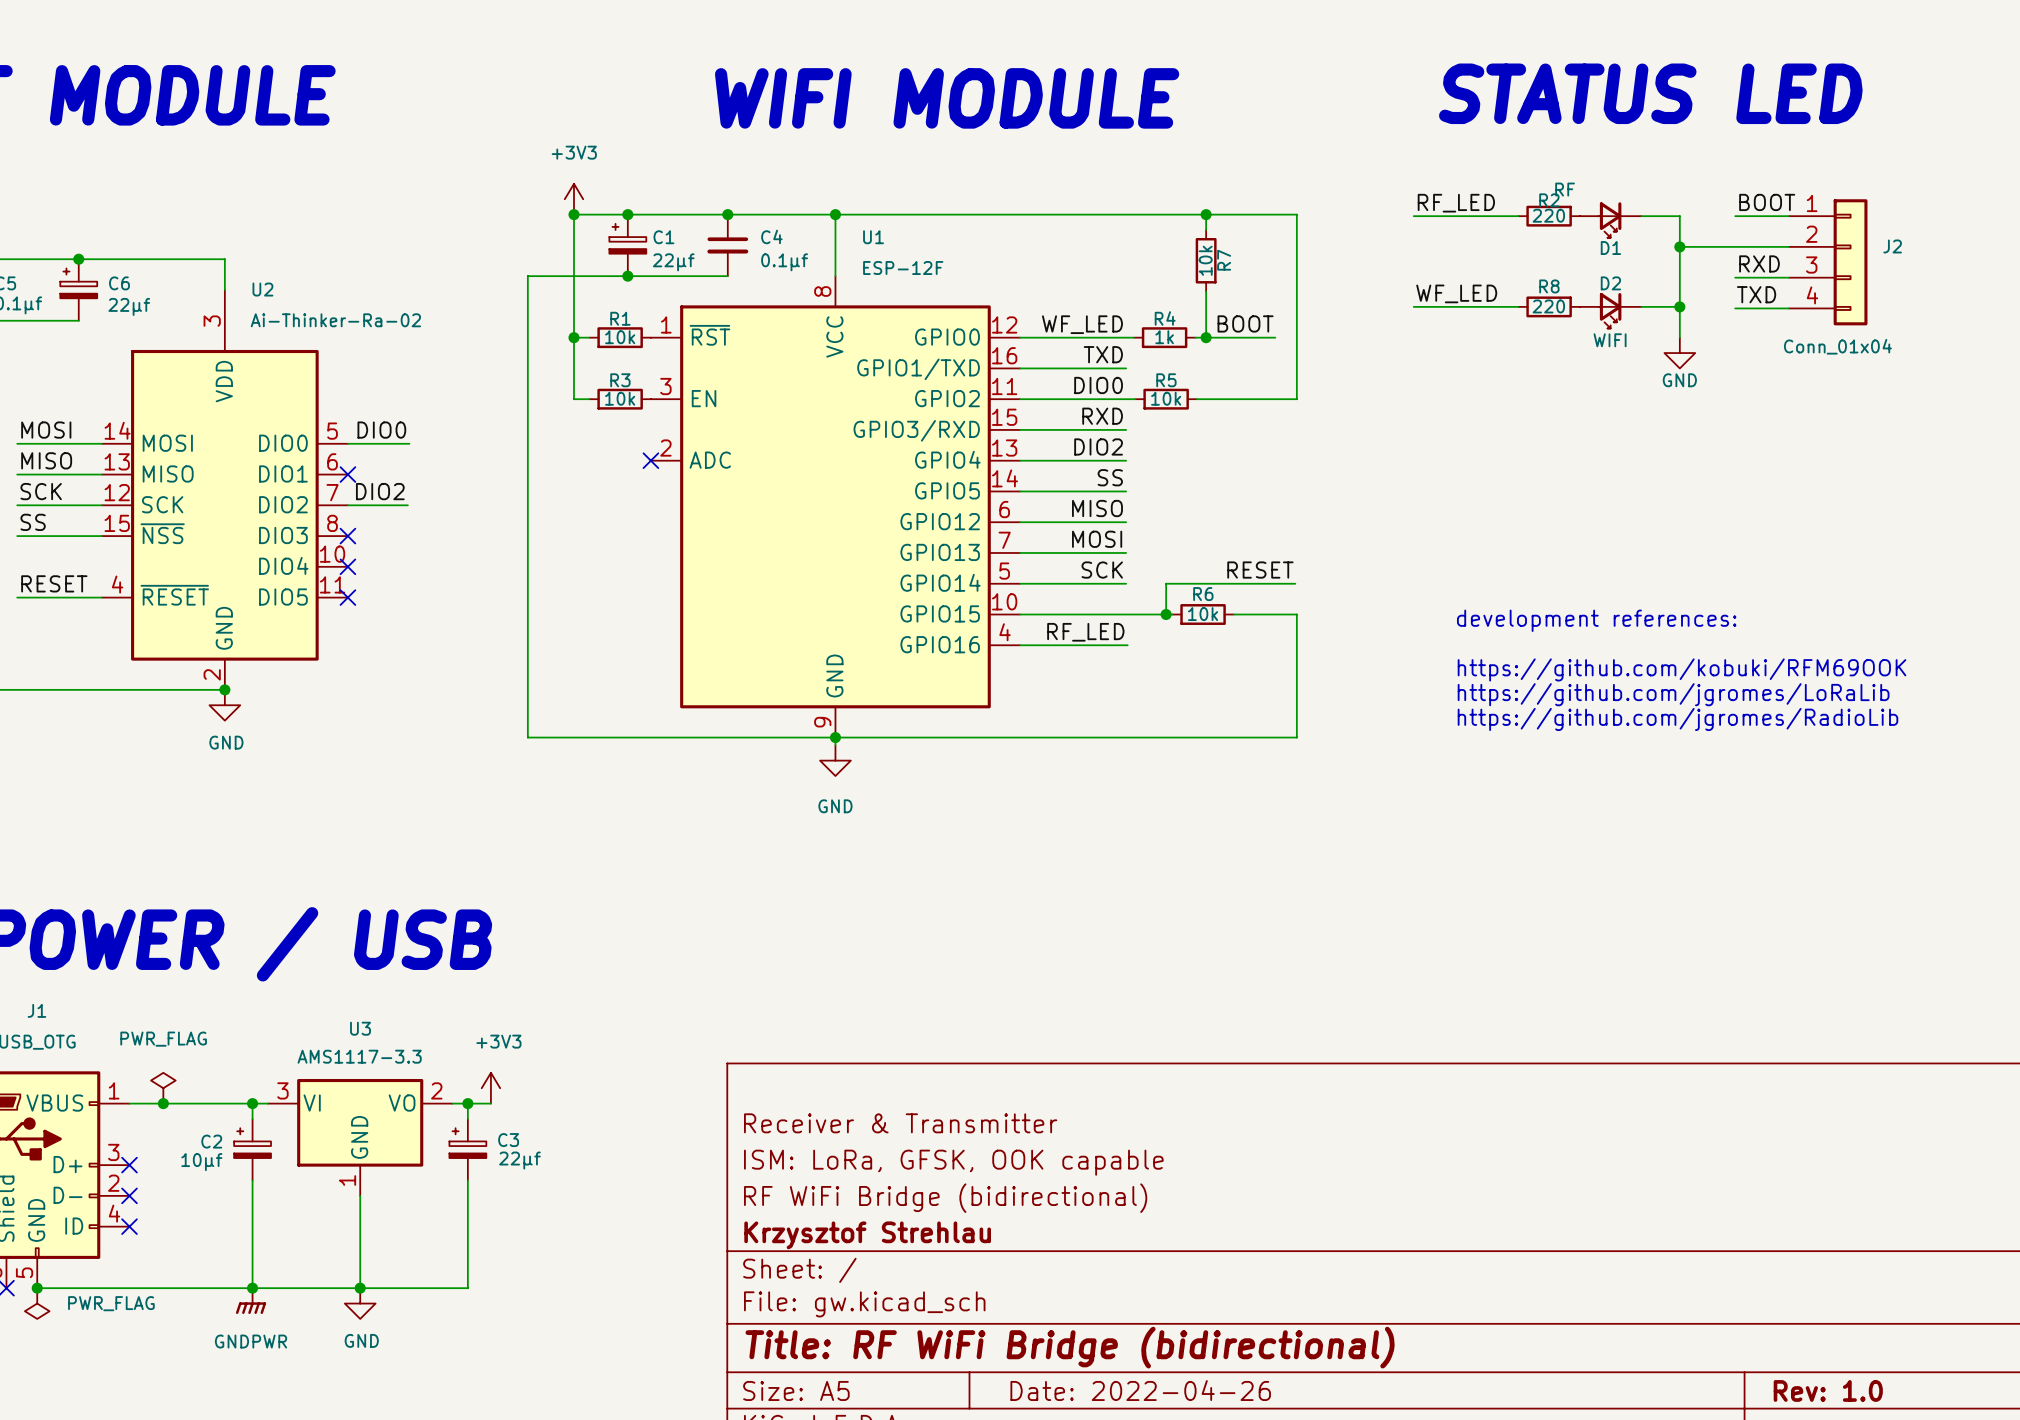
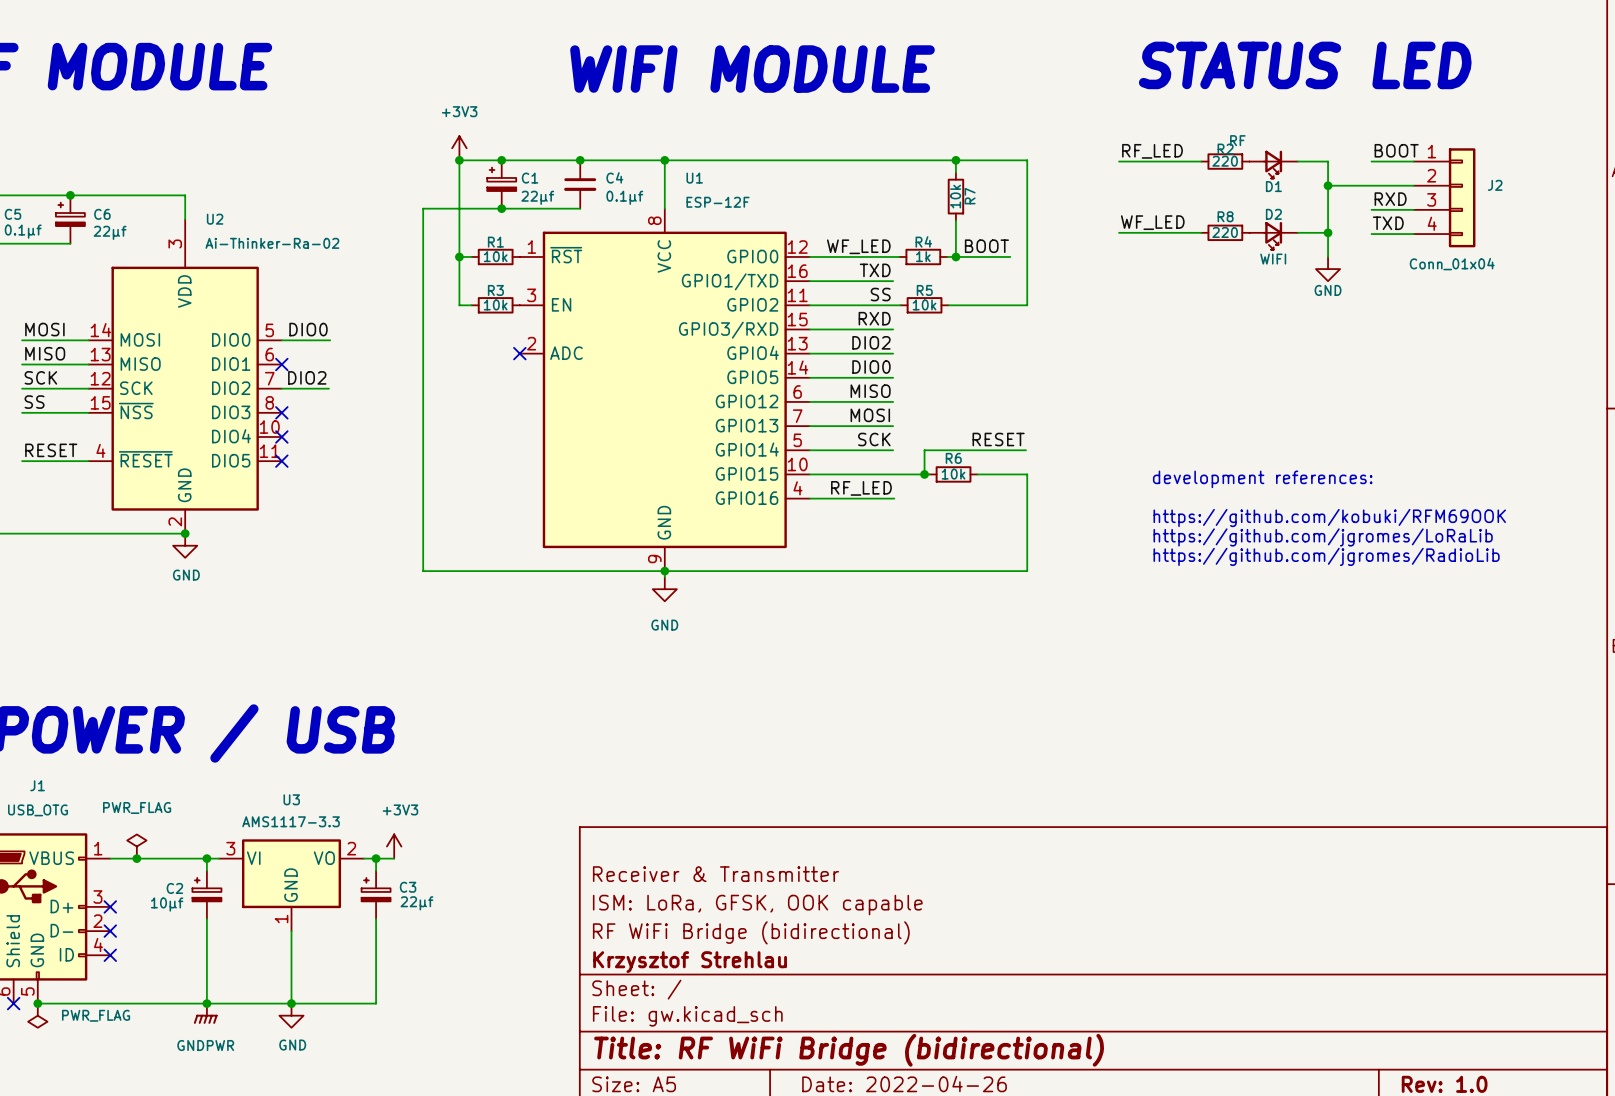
label: DIO0 (1098, 385) -> SS (880, 294)
label: SS (1110, 477) -> DIO0 (871, 367)

